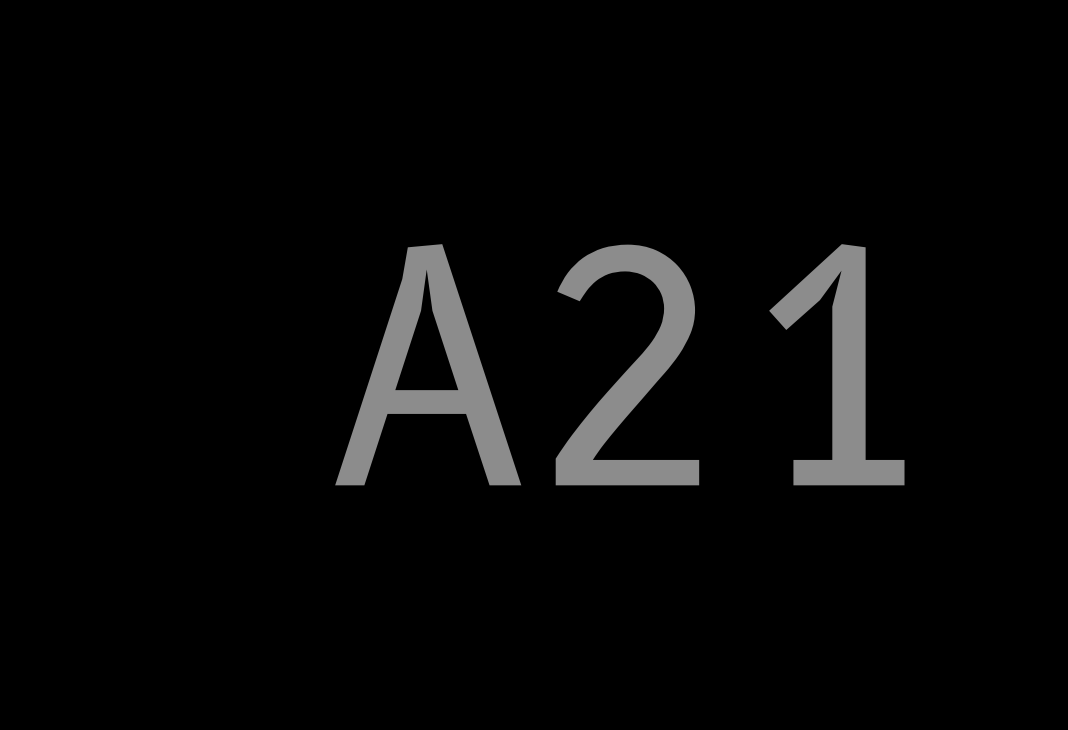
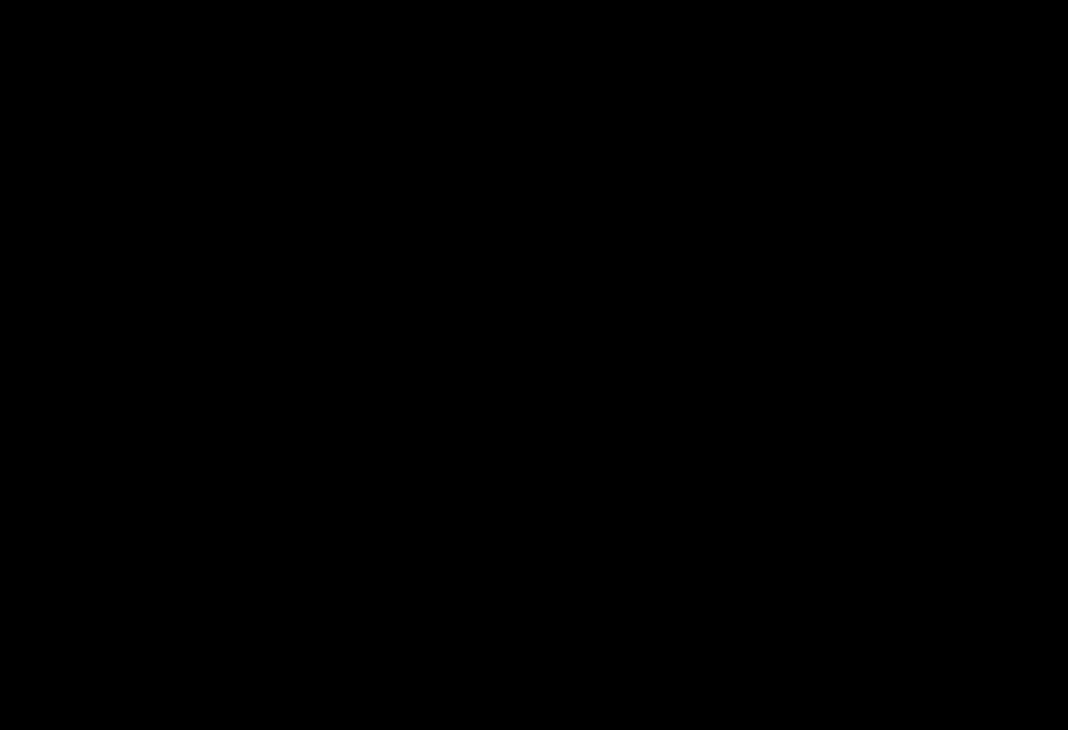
text: A21 (619, 364) -> none

